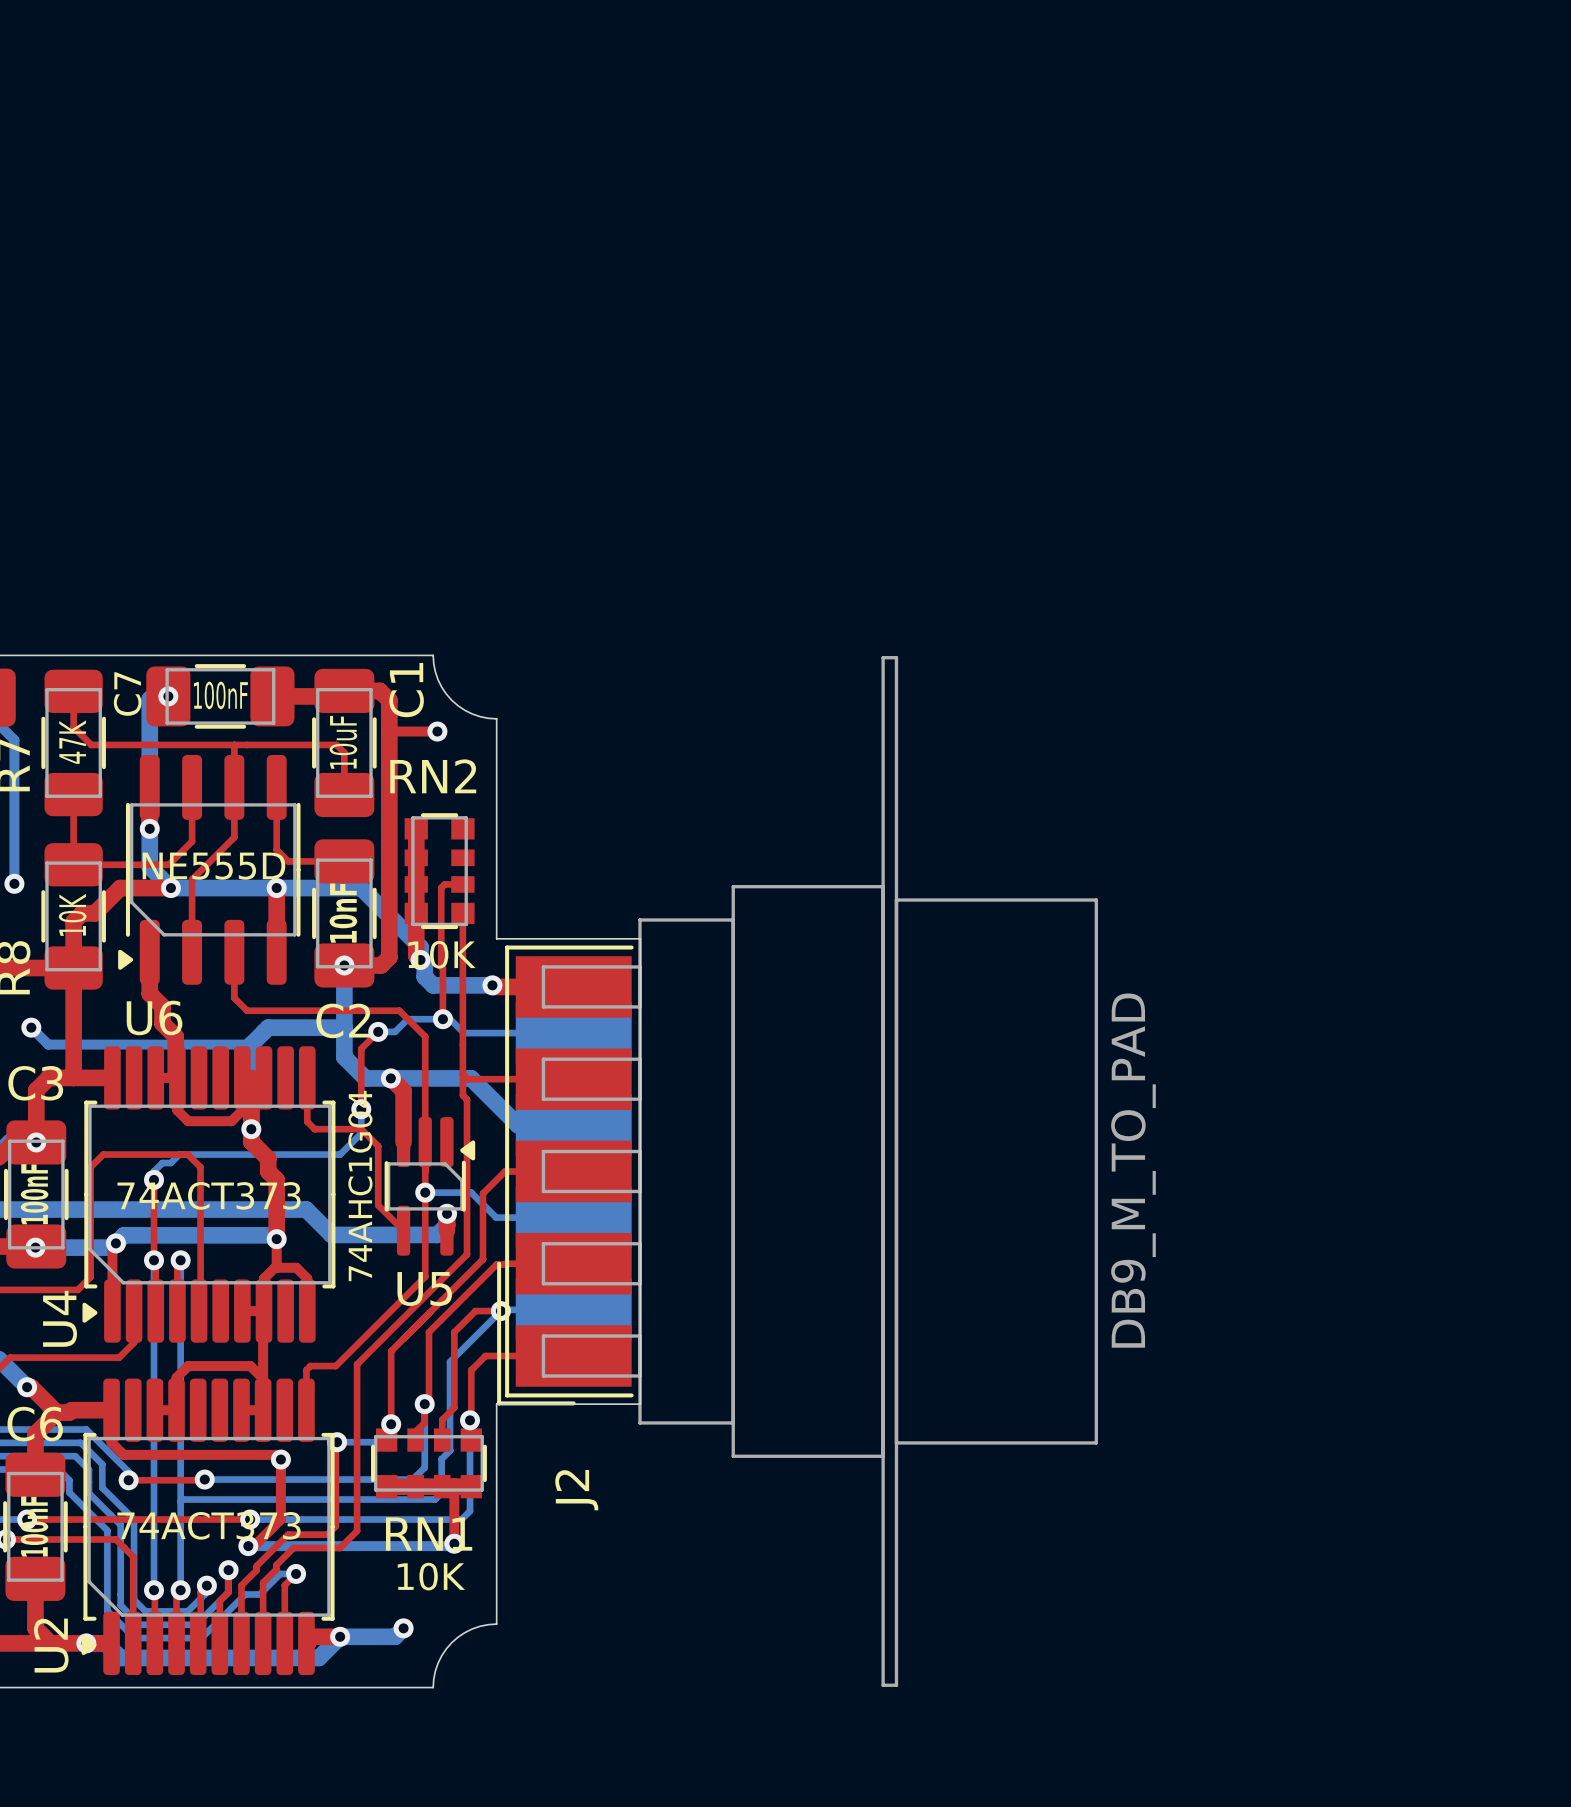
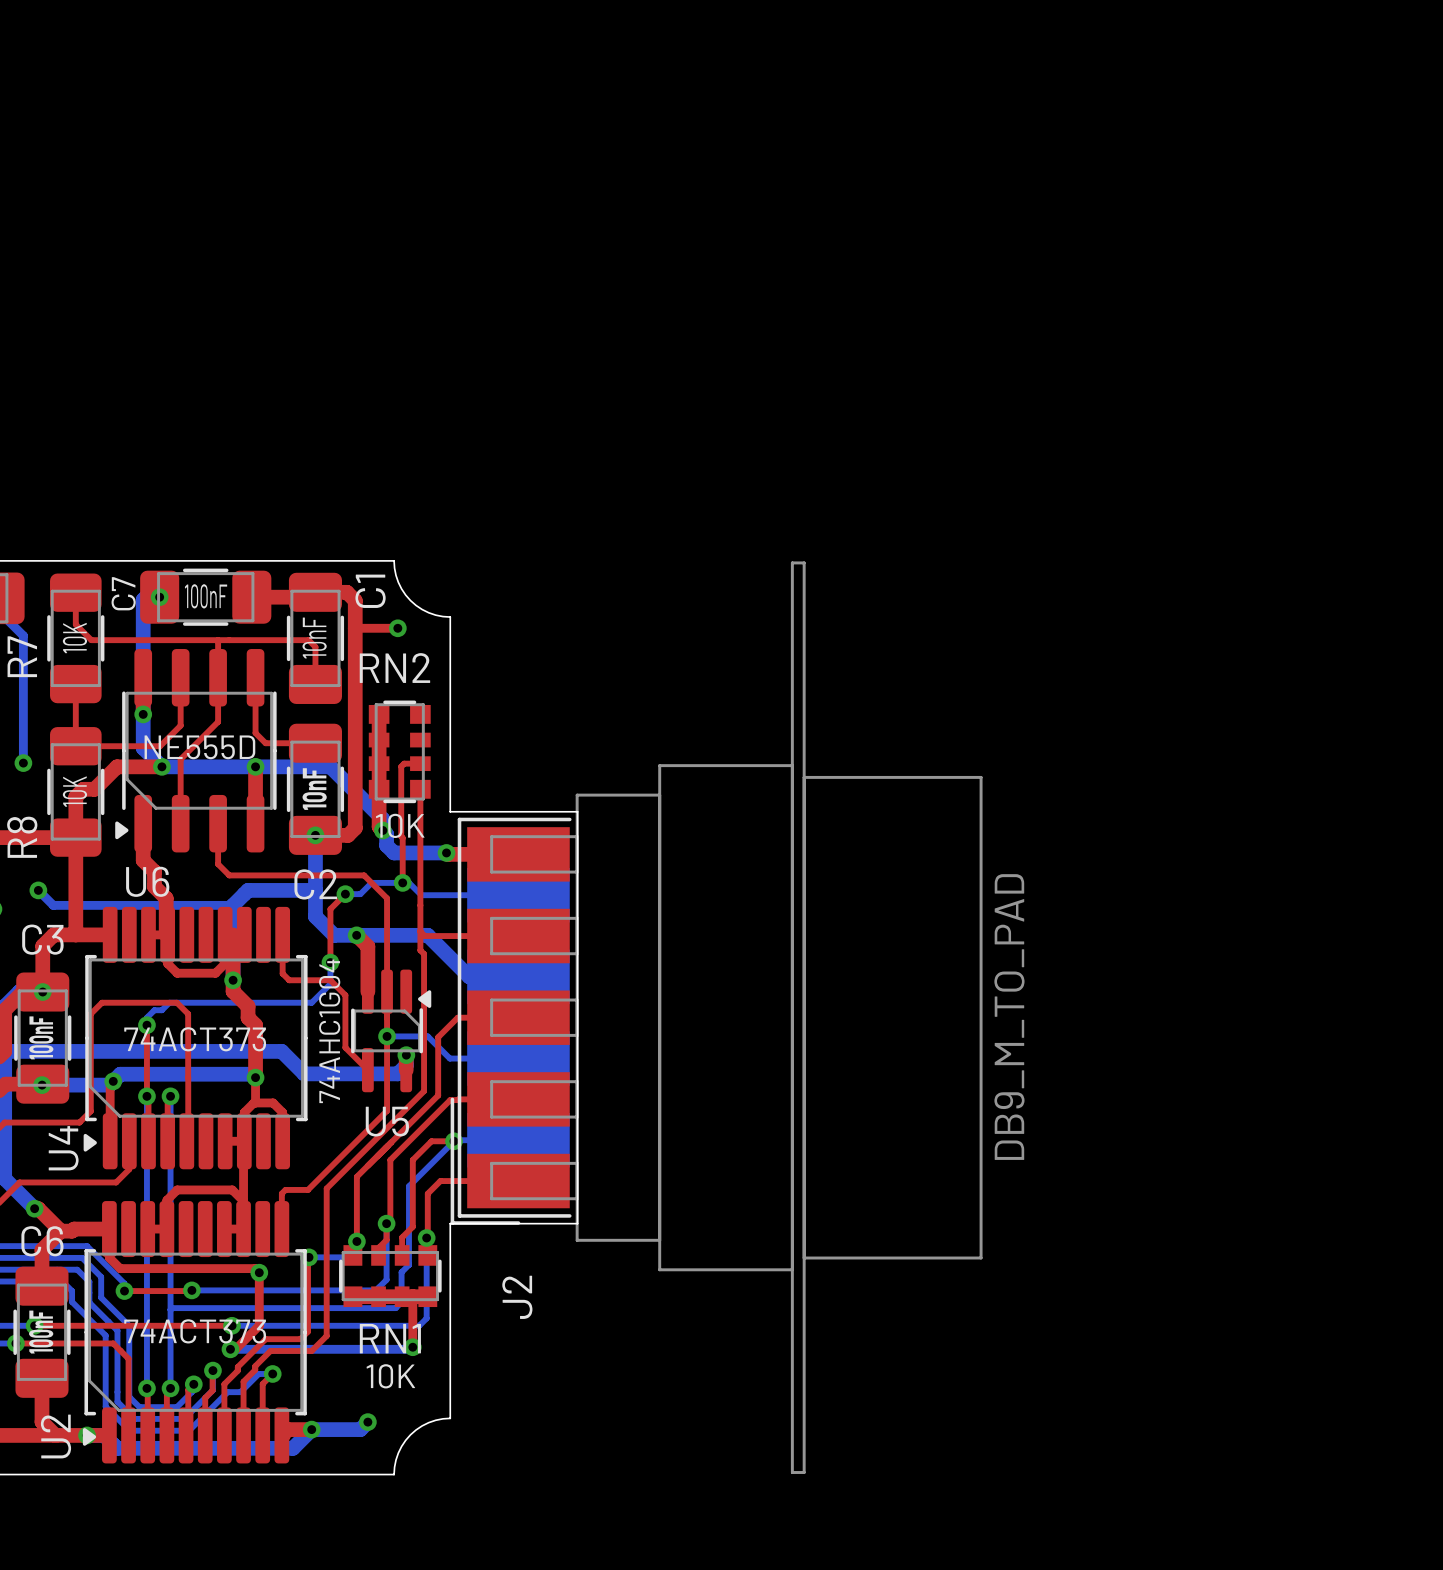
R7 value: 47K (72, 742) -> 10K (74, 638)
C1 value: 10uF (343, 742) -> 10nF (314, 638)

